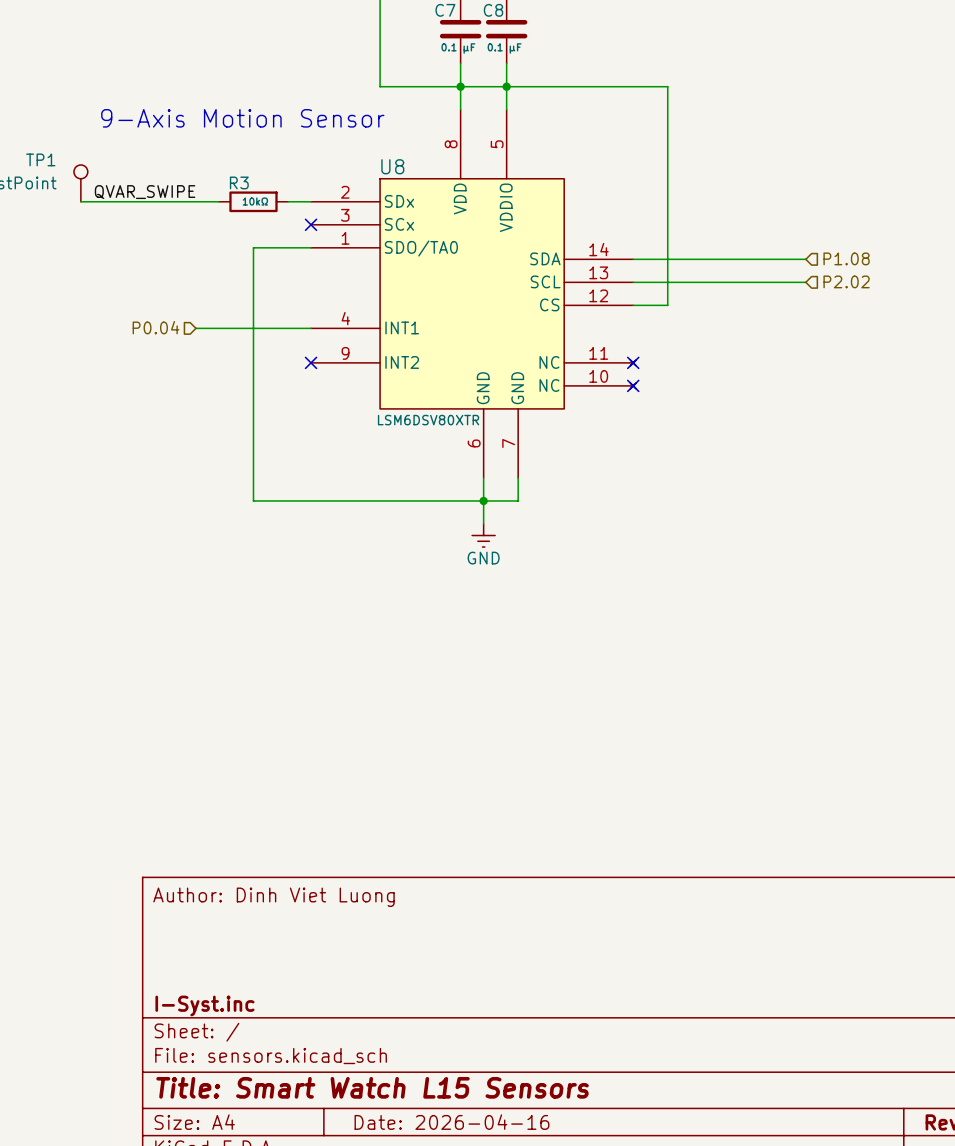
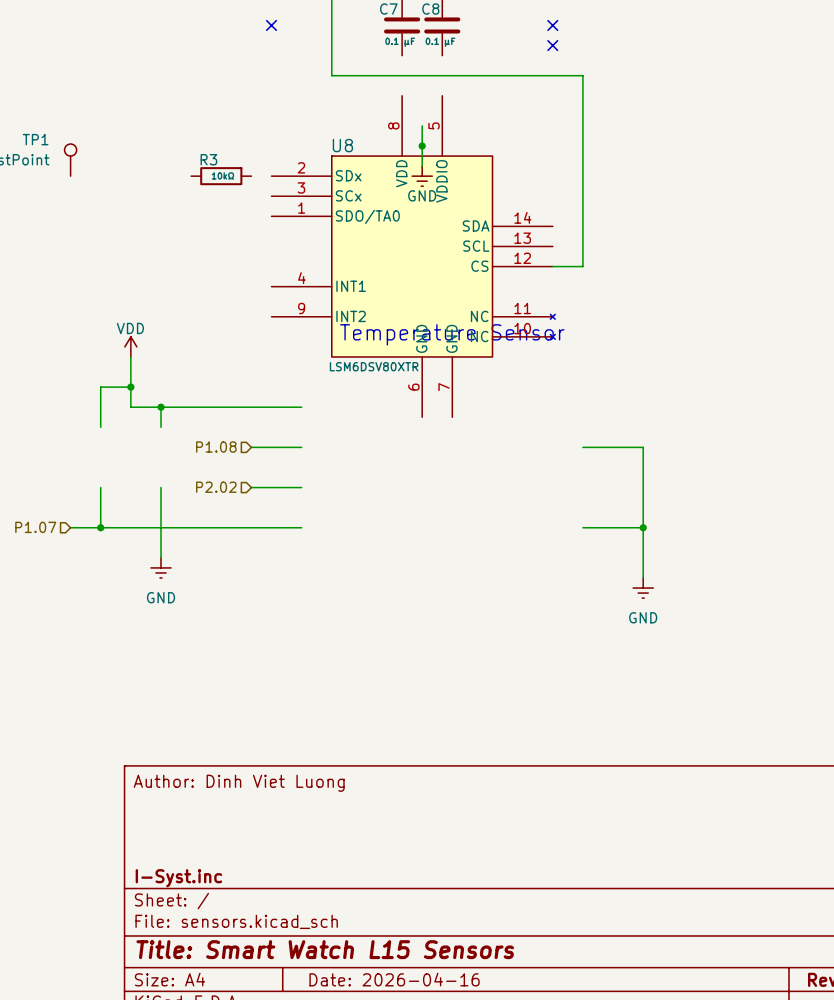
no-connect mark: none -> (271, 25)
no-connect mark: none -> (552, 25)
no-connect mark: none -> (552, 45)
wire: (460, 63) (460, 109) -> (422, 125) (422, 166)
wire: (506, 63) (506, 109) -> none
junction: (460, 86) -> none
junction: (506, 86) -> none
text: 9-Axis Motion Sensor (242, 118) -> none
junction: none -> (422, 146)
label: QVAR_SWIPE (145, 192) -> none
wire: (80, 201) (218, 201) -> none
wire: (288, 201) (311, 201) -> none
power symbol: none -> GND (422, 176)
no-connect mark: (311, 224) -> none
wire: (311, 247) (253, 247) (253, 500) (518, 500) (518, 477) -> none
hierarchical label: P1.08 (846, 258) -> none
wire: (633, 259) (805, 259) -> none
hierarchical label: P2.02 (846, 281) -> none
wire: (633, 282) (805, 282) -> none
hierarchical label: P0.04 (156, 327) -> none
wire: (195, 328) (311, 328) -> none
no-connect mark: (311, 362) -> none
no-connect mark: (633, 362) -> none
text: none -> Temperature Sensor (452, 334)
no-connect mark: (633, 385) -> none
power symbol: none -> VDD (130, 346)
wire: none -> (130, 356) (130, 407) (301, 407)
wire: none -> (130, 387) (100, 387) (100, 427)
junction: none -> (130, 387)
wire: none -> (161, 407) (161, 427)
junction: none -> (161, 407)
wire: (483, 477) (483, 524) -> none
junction: (483, 500) -> none
hierarchical label: none -> P1.08 (216, 447)
wire: none -> (251, 447) (301, 447)
wire: none -> (582, 447) (643, 447) (643, 577)
power symbol: GND (483, 535) -> none
wire: none -> (100, 487) (100, 527)
wire: none -> (161, 487) (161, 557)
hierarchical label: none -> P2.02 (216, 487)
wire: none -> (251, 487) (301, 487)
hierarchical label: none -> P1.07 (35, 527)
wire: none -> (70, 527) (301, 527)
junction: none -> (100, 527)
wire: none -> (582, 527) (643, 527)
junction: none -> (643, 527)
power symbol: none -> GND (161, 567)
power symbol: none -> GND (643, 588)

